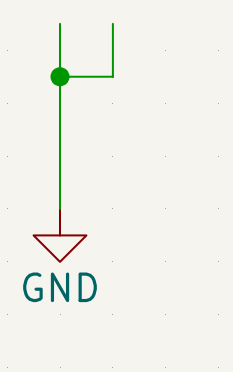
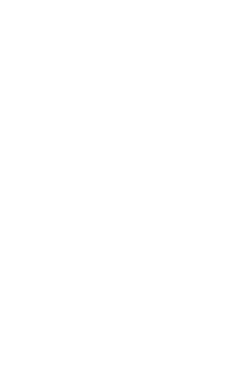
wire: (60, 23) (60, 208) -> none
wire: (112, 23) (112, 76) (60, 76) -> none
junction: (60, 76) -> none
power symbol: GND (60, 235) -> none

